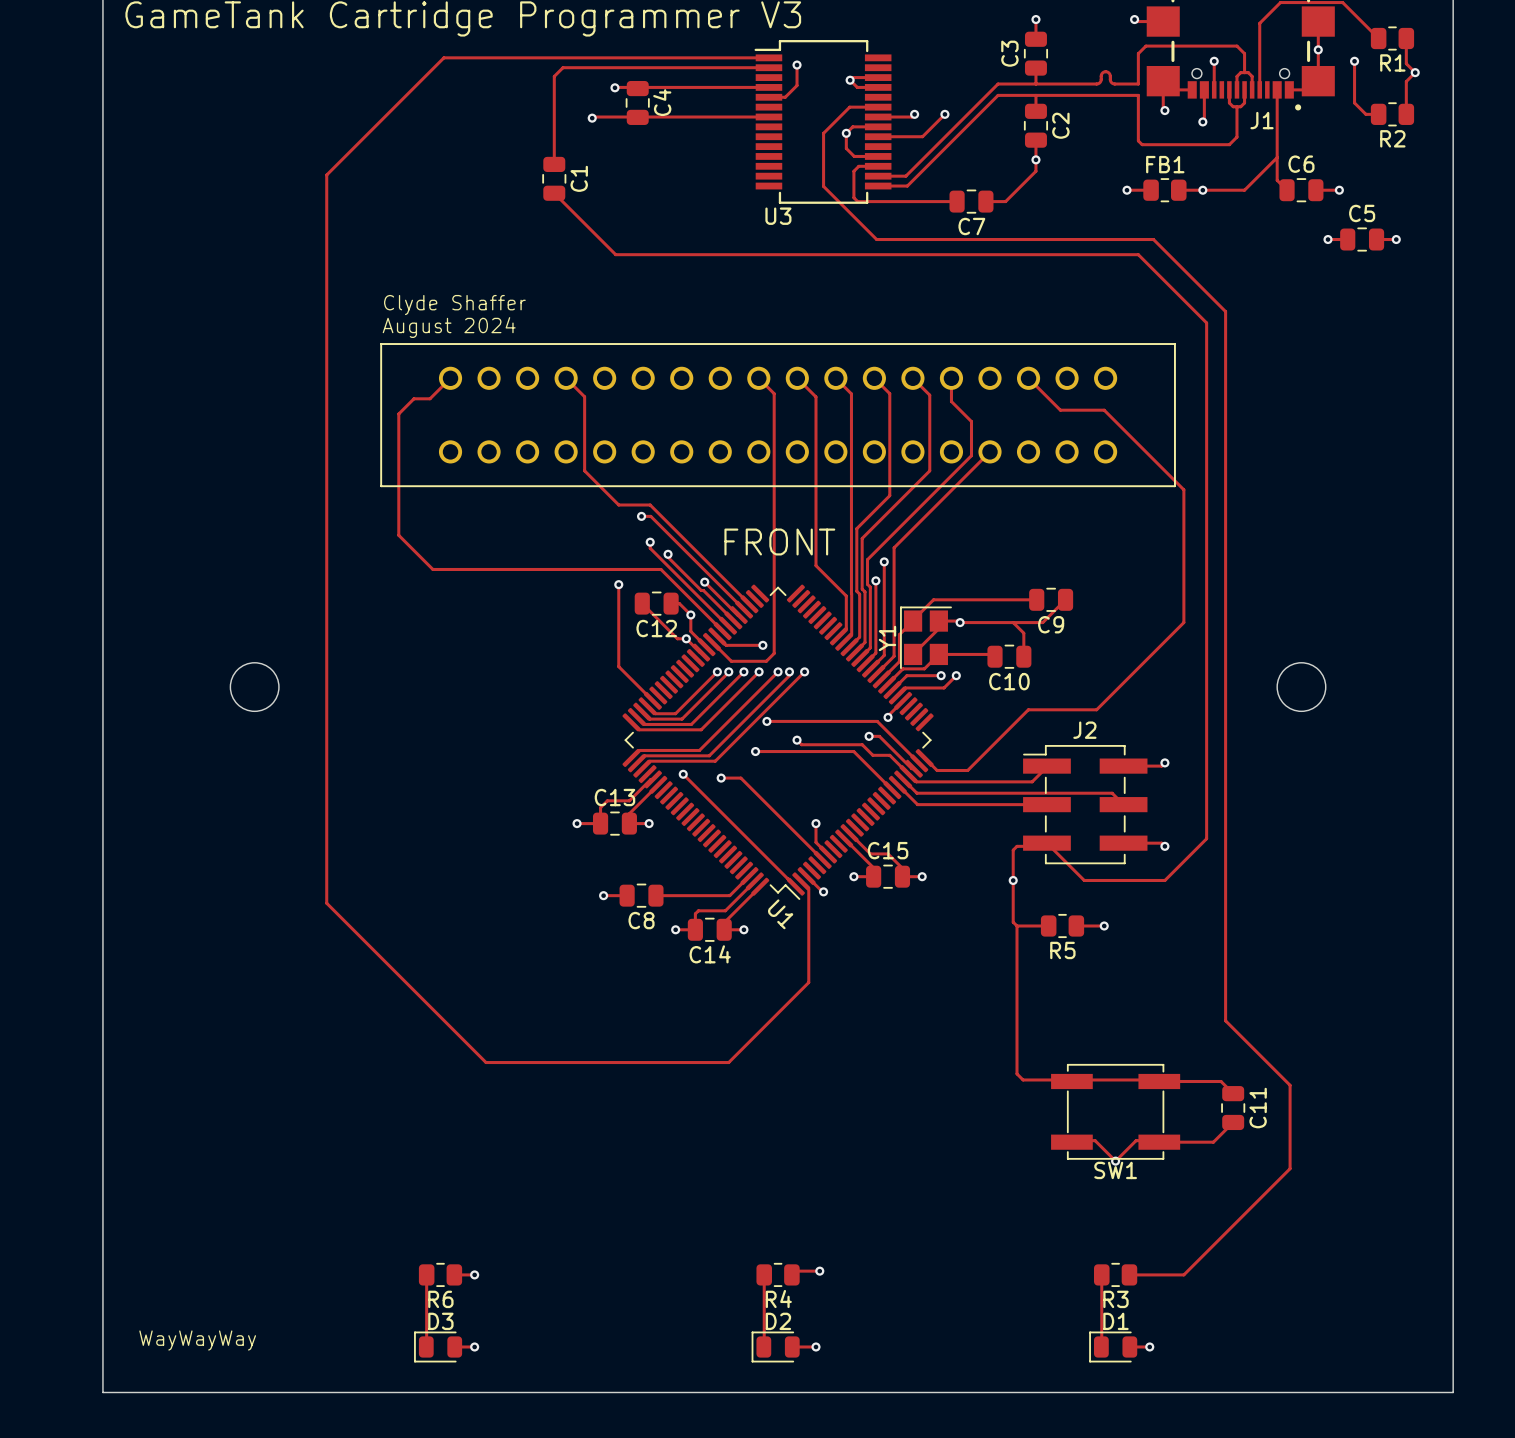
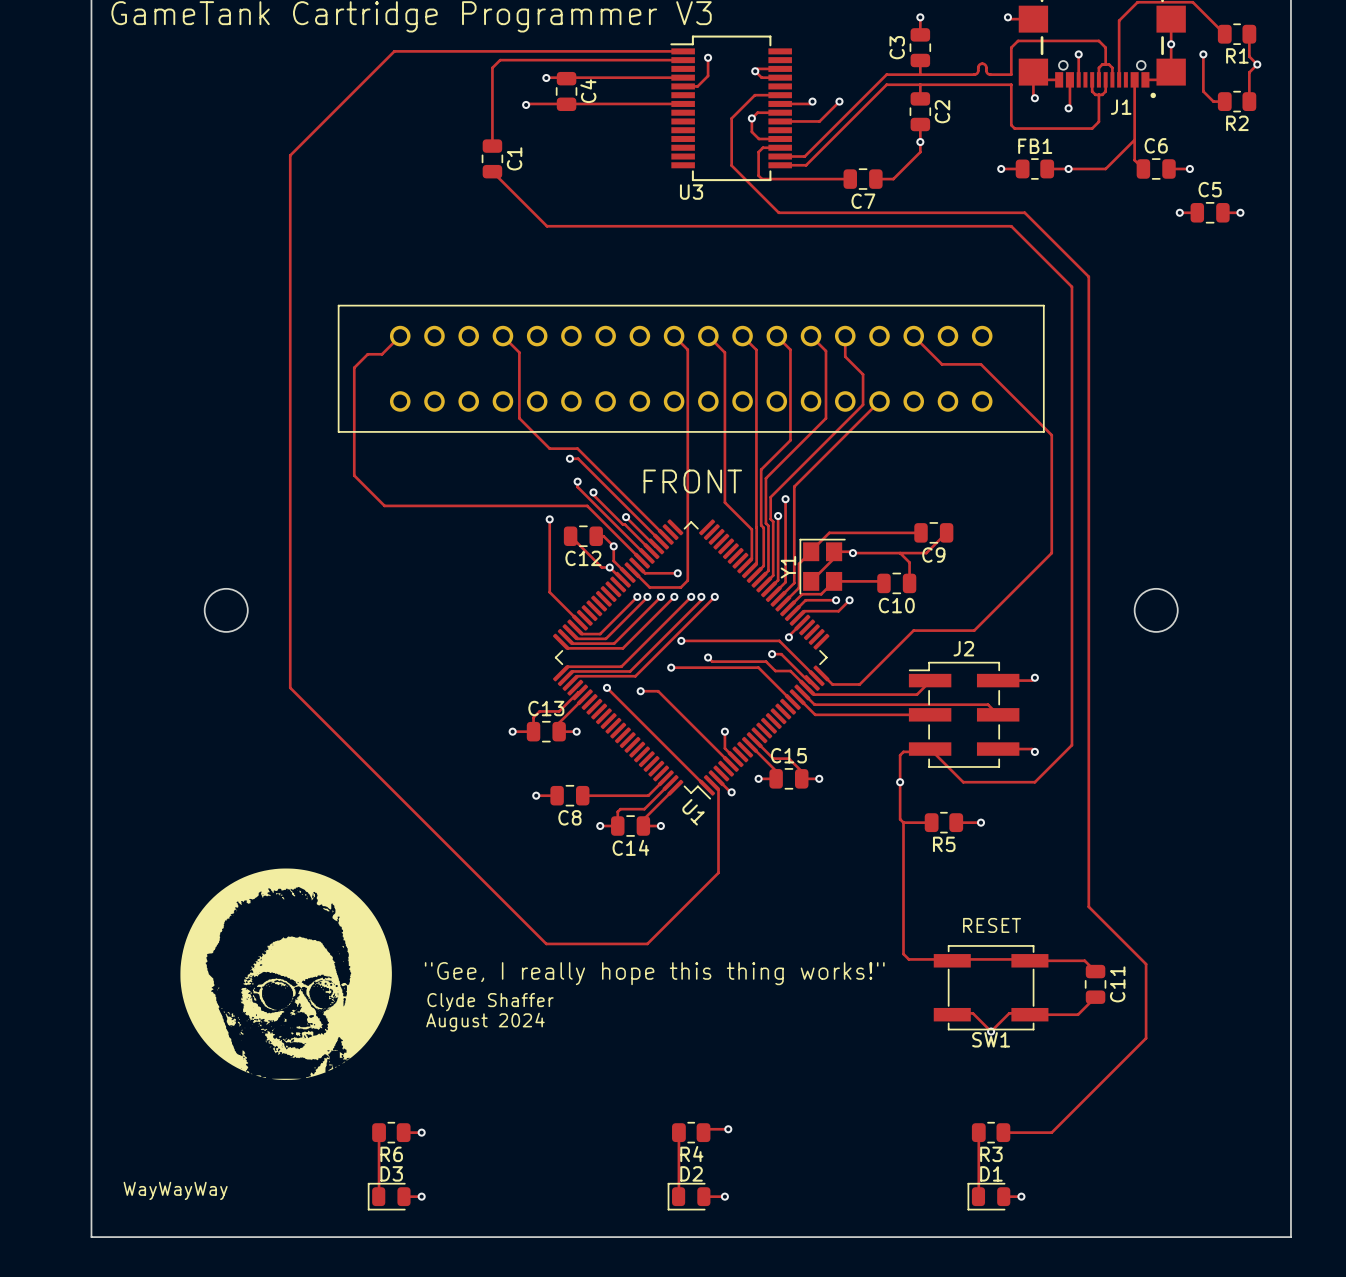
text: Clyde Shaffer (454, 305) -> none
text: August 2024 (449, 327) -> none
track: (326, 774) (326, 903) (486, 1062) (614, 1062) -> (290, 687) (546, 943)
drawing: none -> [180, 868, 392, 1080]
text: none -> RESET (992, 925)
text: none -> "Gee, I really hope this thing works!" (654, 973)
text: none -> Clyde Shaffer (490, 1002)
text: none -> August 2024 (485, 1022)

